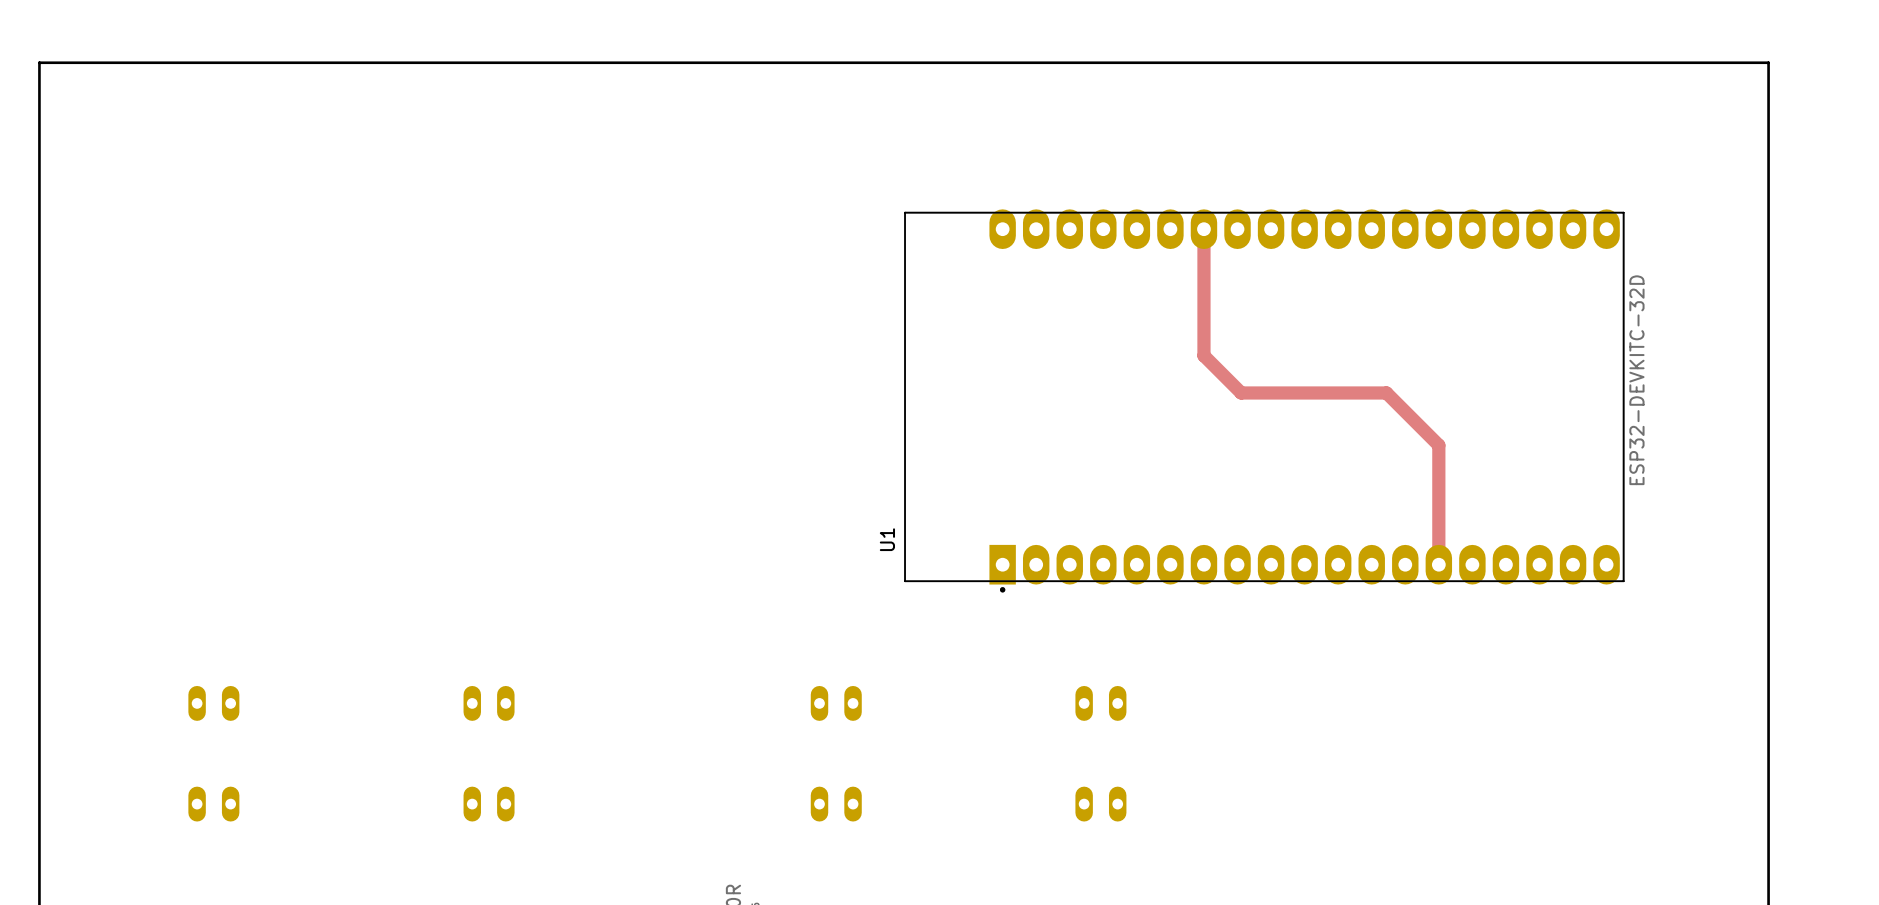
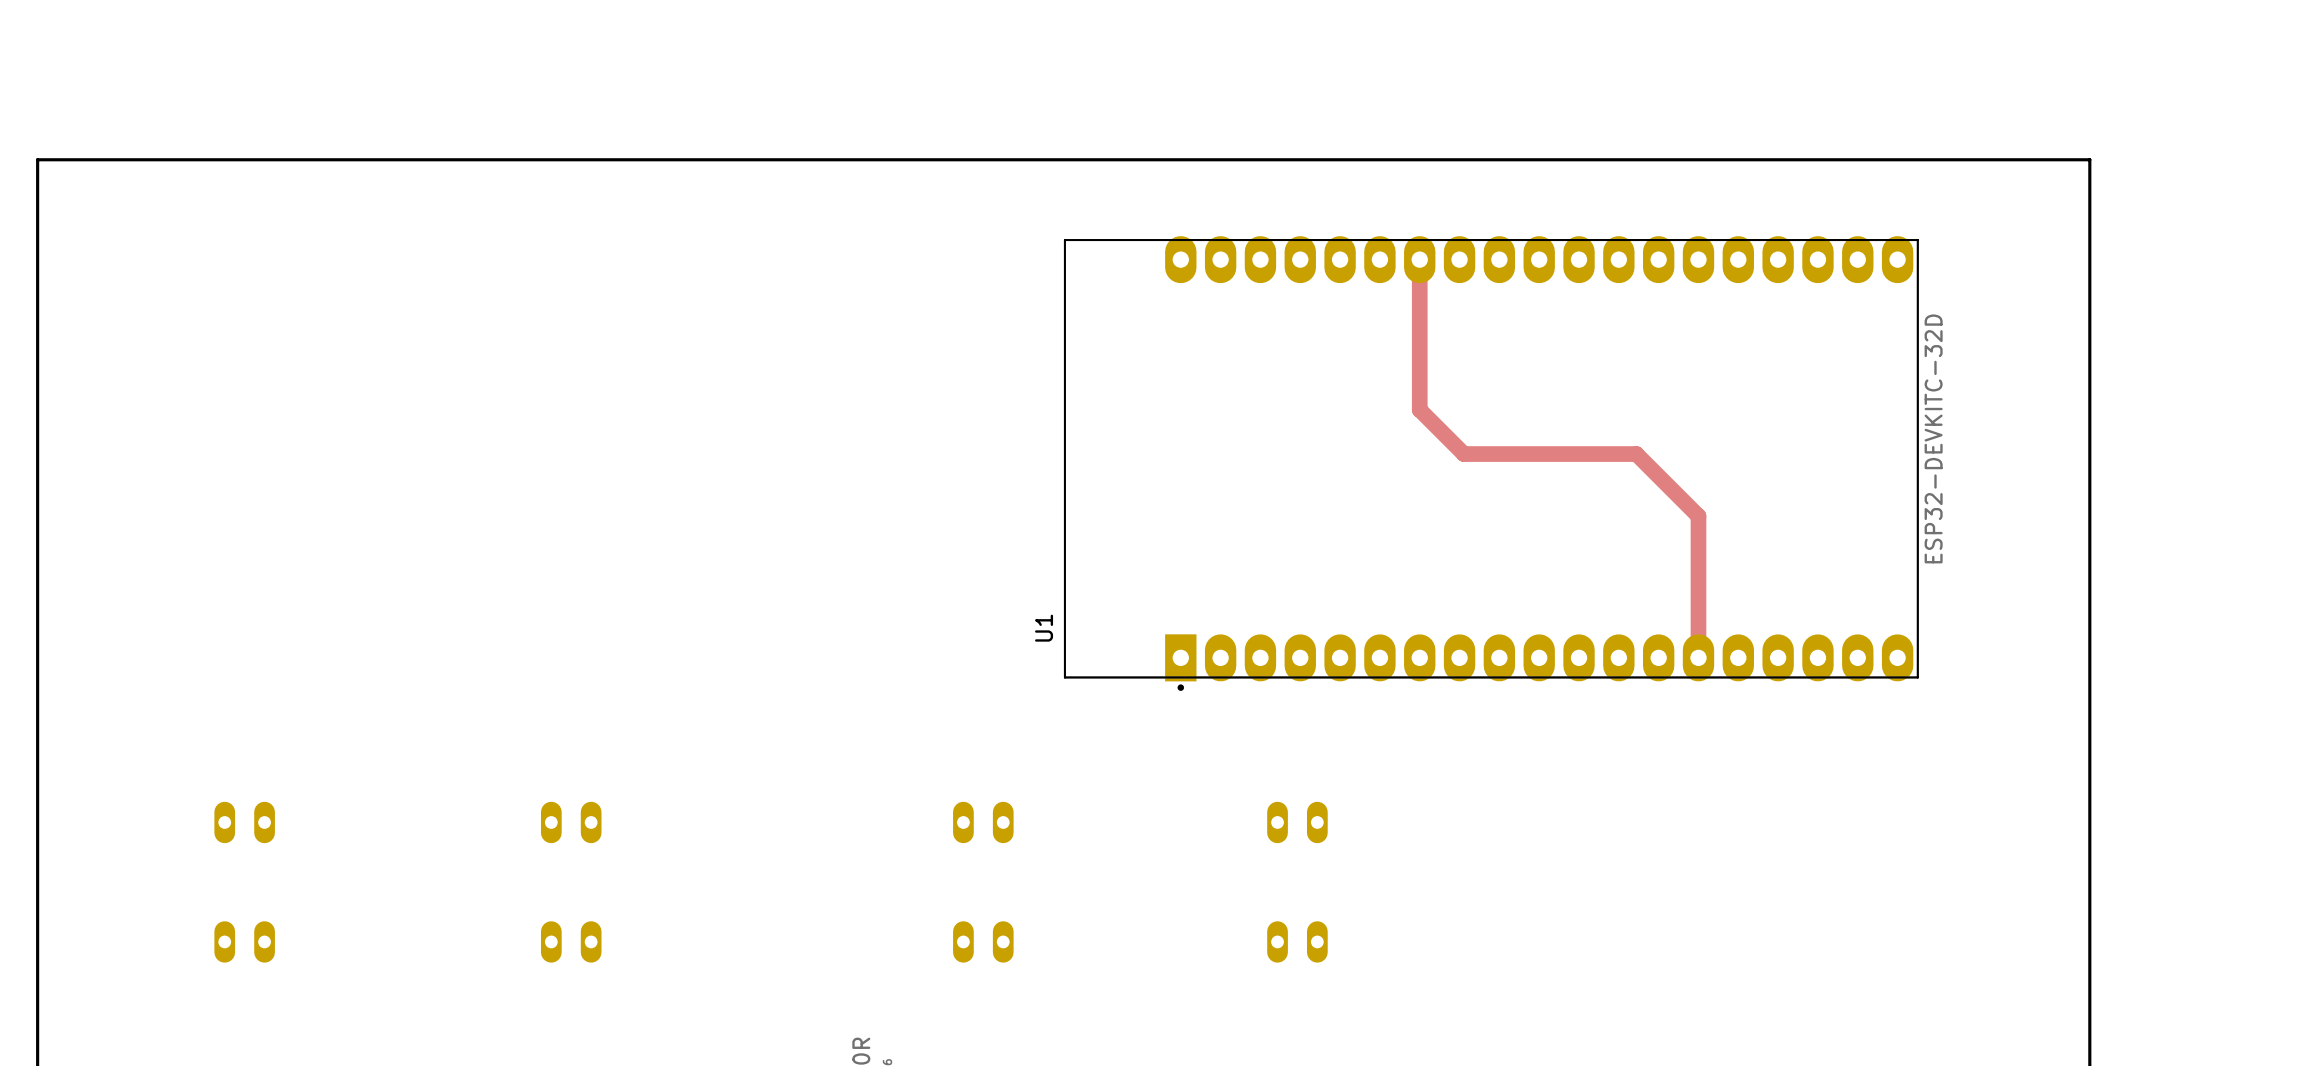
board edge: (39, 145) (39, 62) (1768, 62) (1768, 145) -> (37, 159) (2089, 159)

